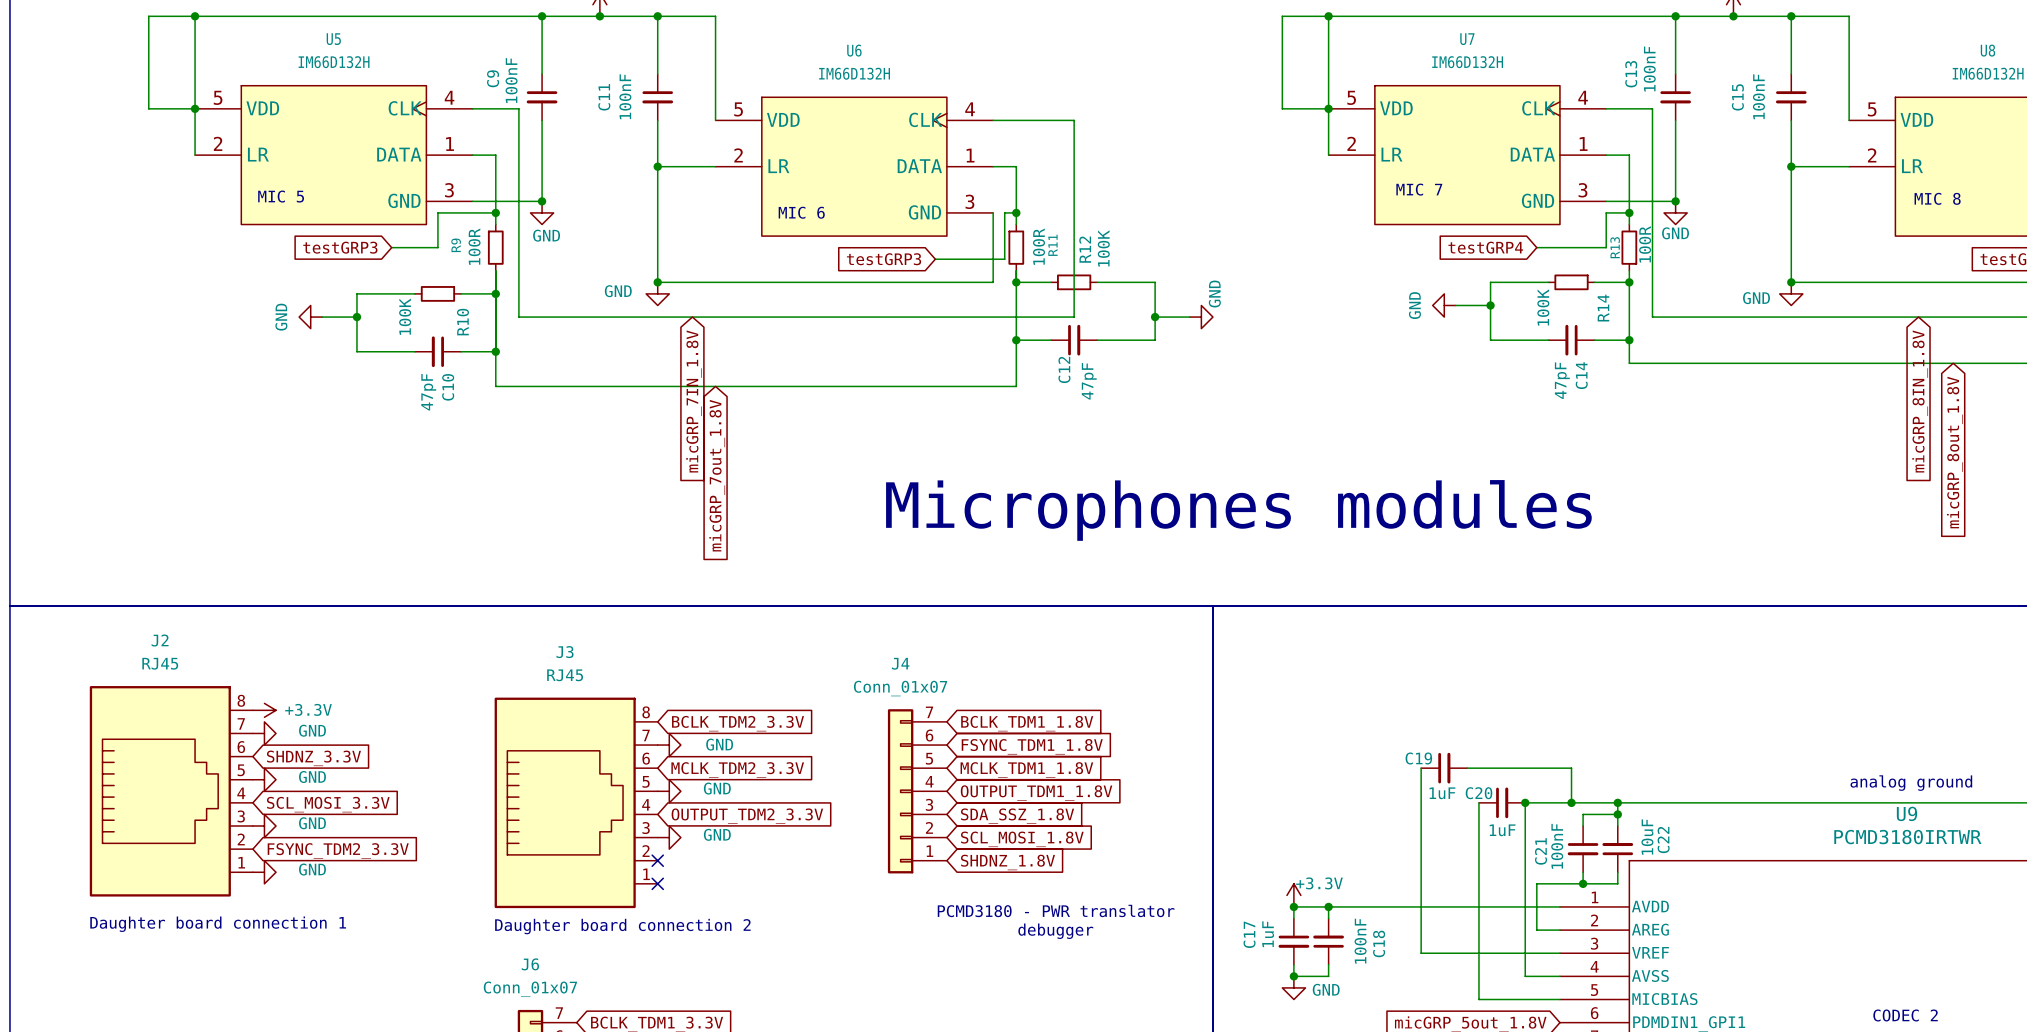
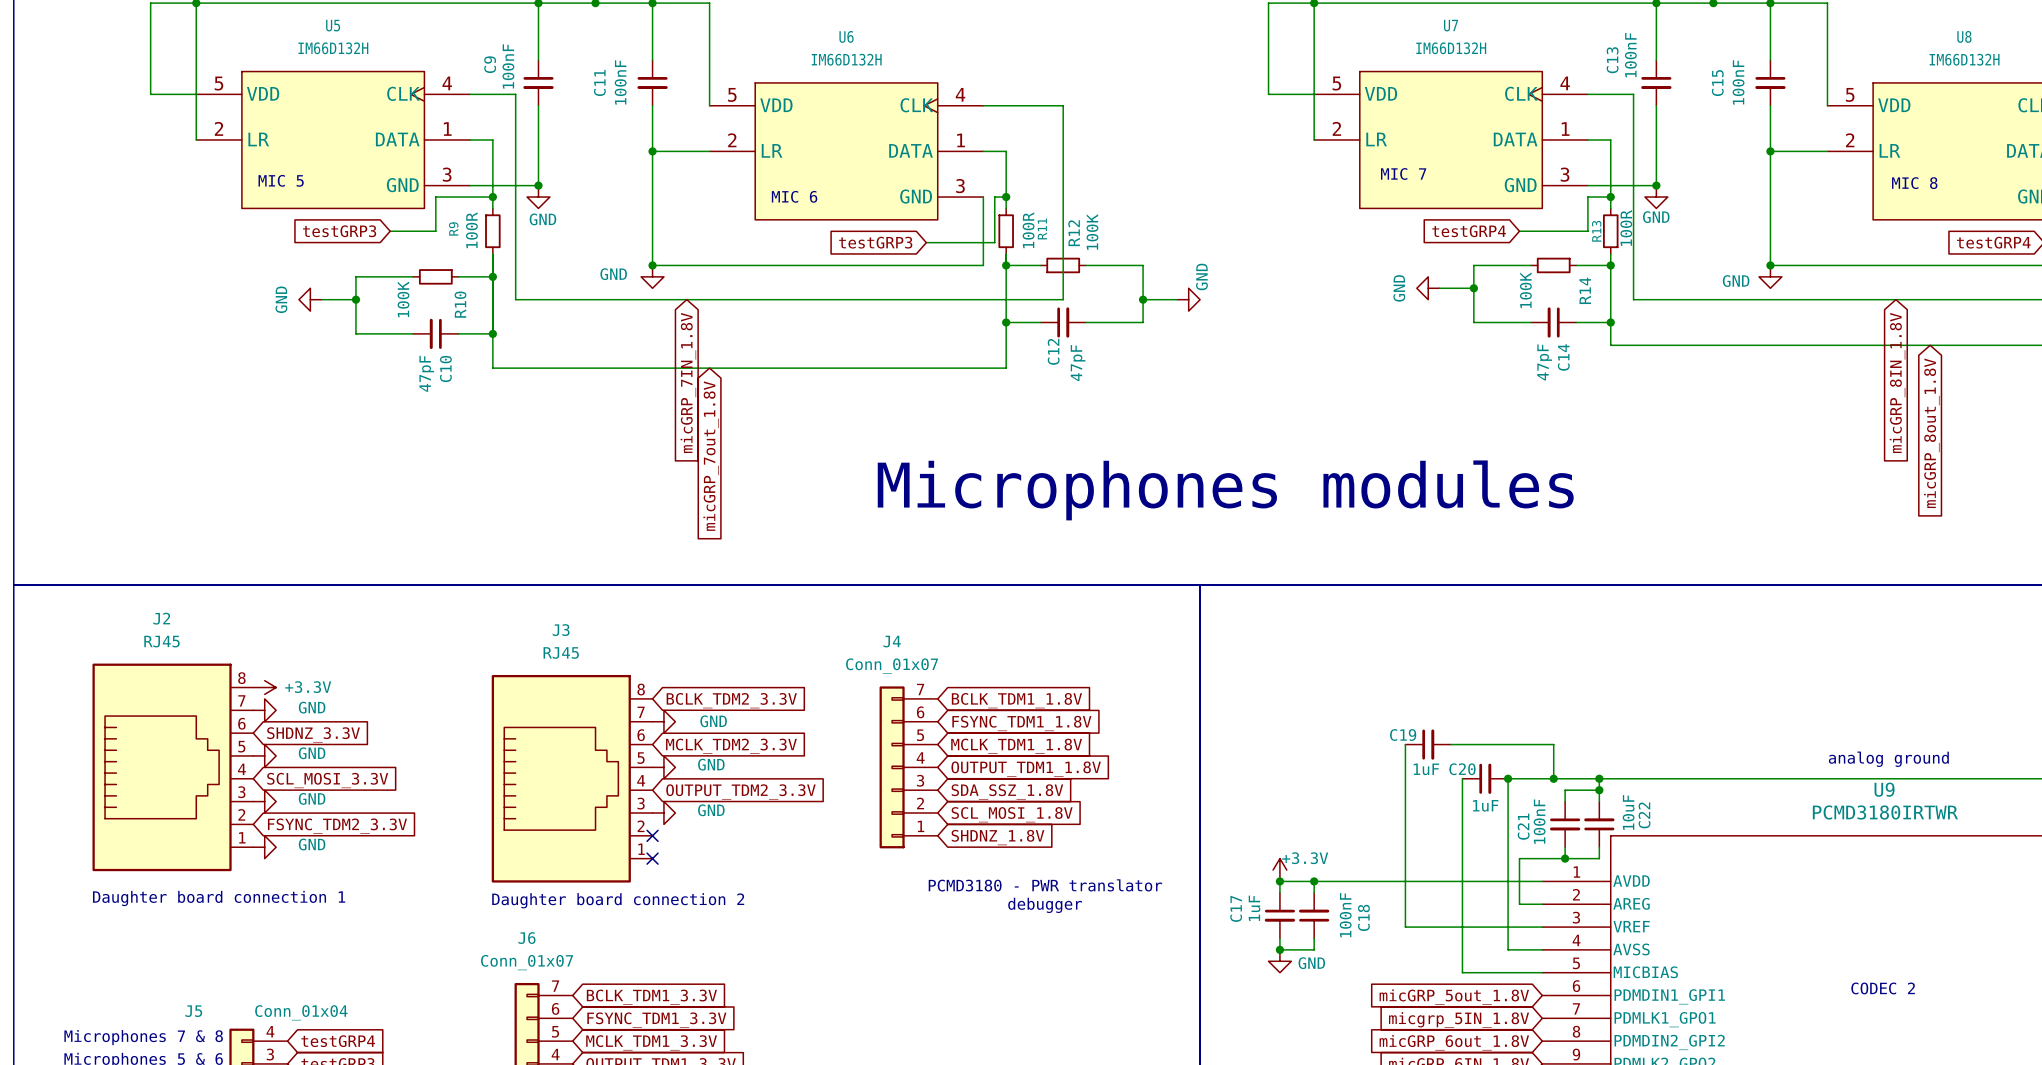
junction: (195, 108) -> none
junction: (1328, 108) -> none

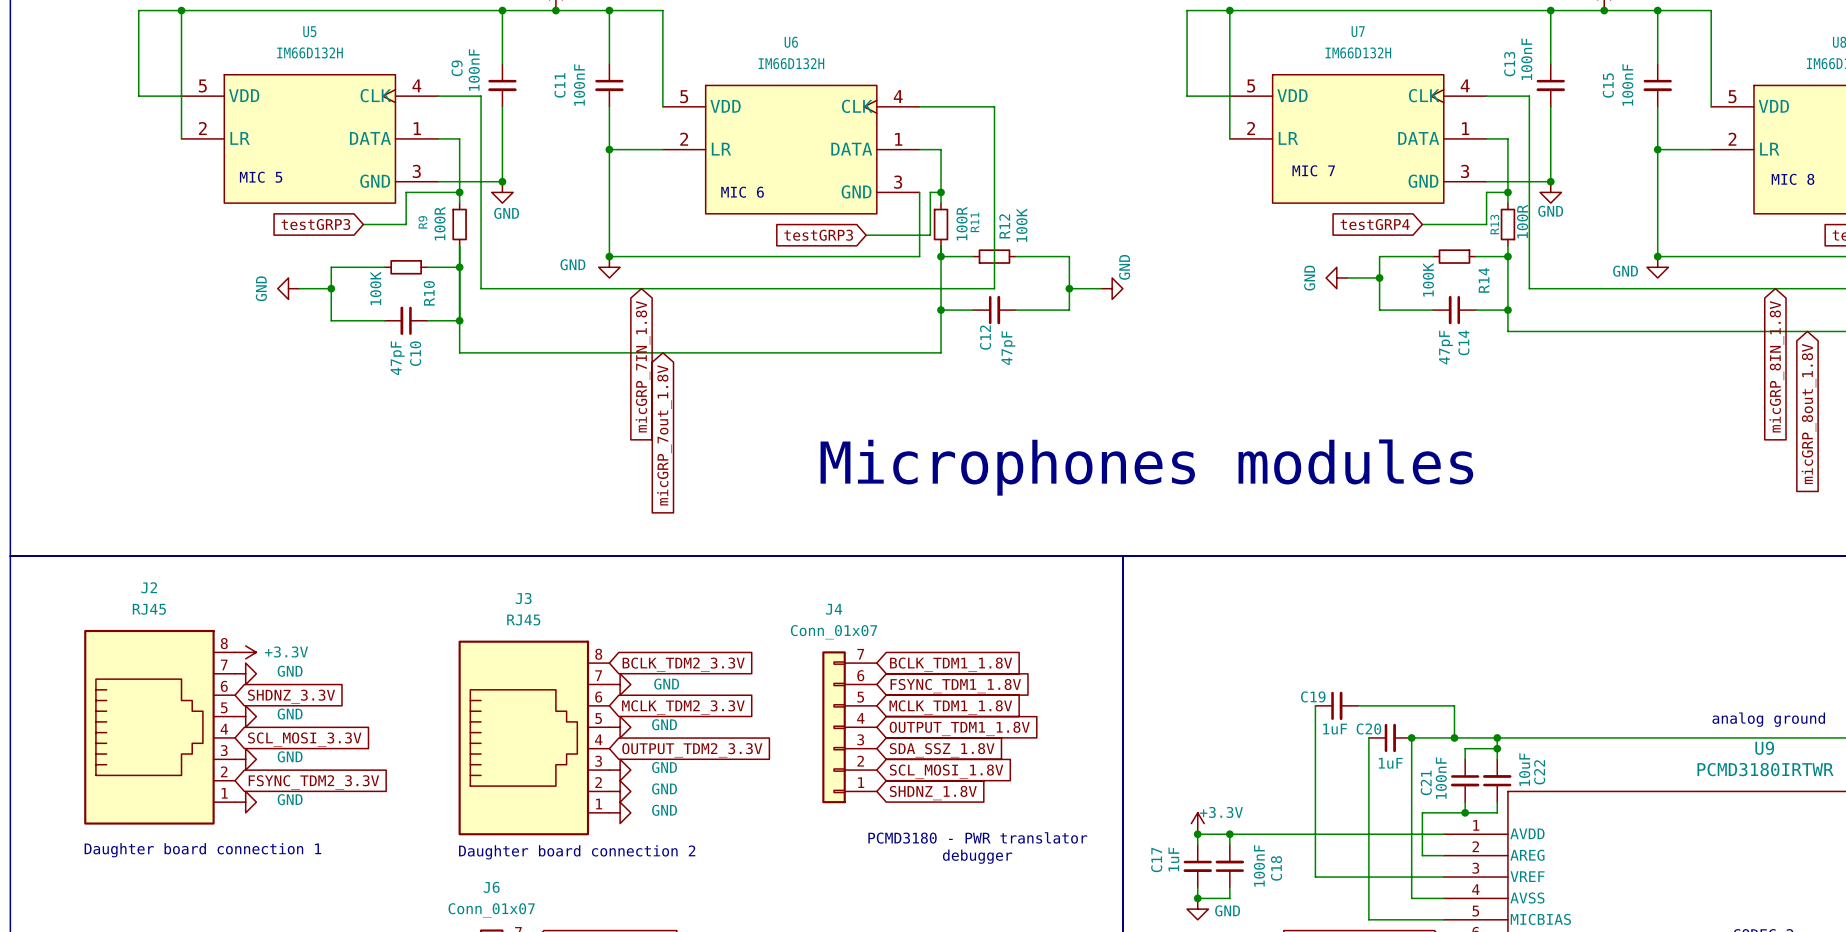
no-connect mark: (652, 835) -> none
power symbol: none -> GND (620, 791)
no-connect mark: (652, 858) -> none
power symbol: none -> GND (620, 812)

